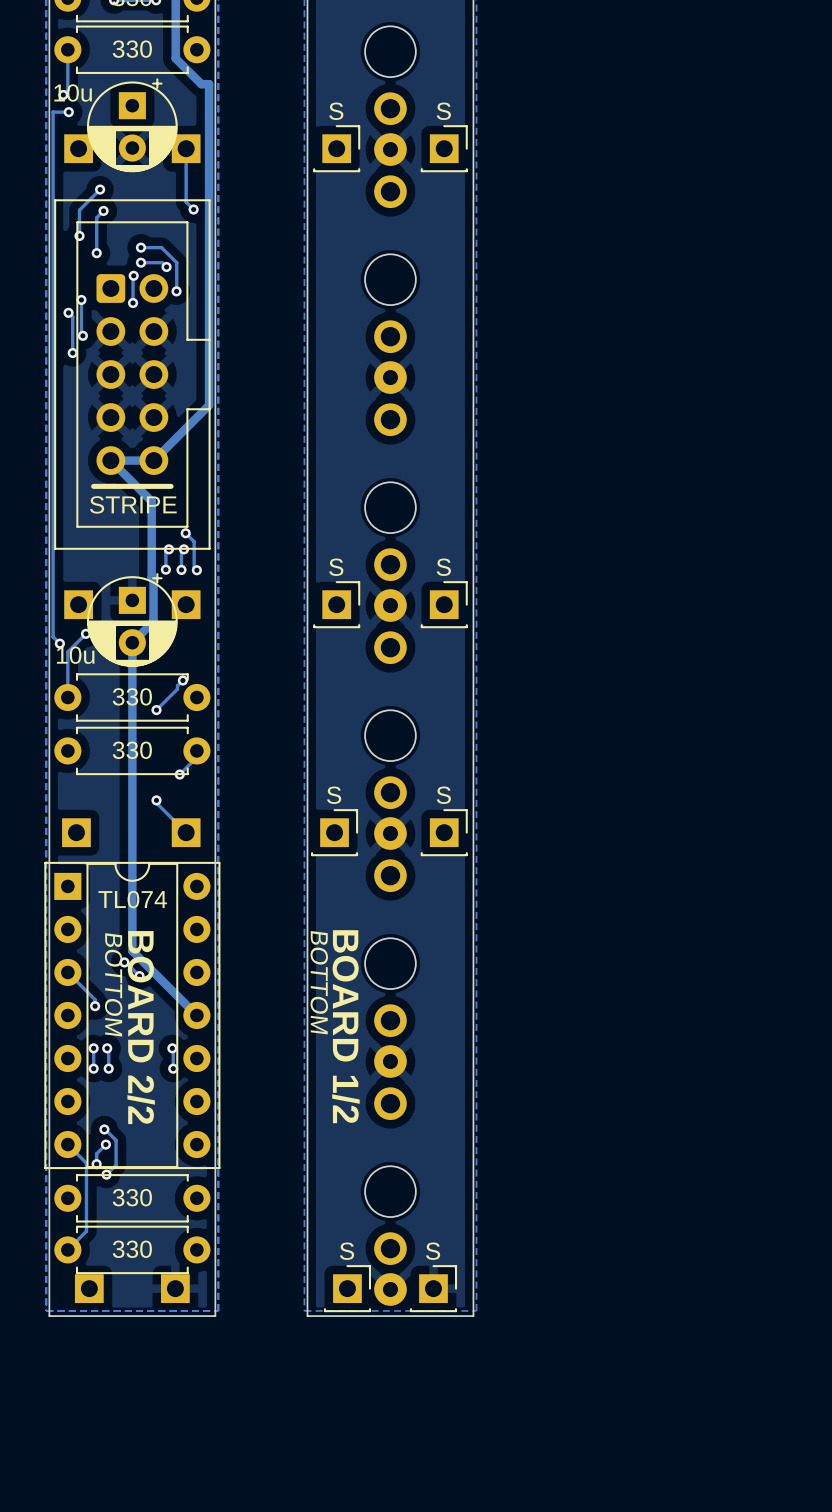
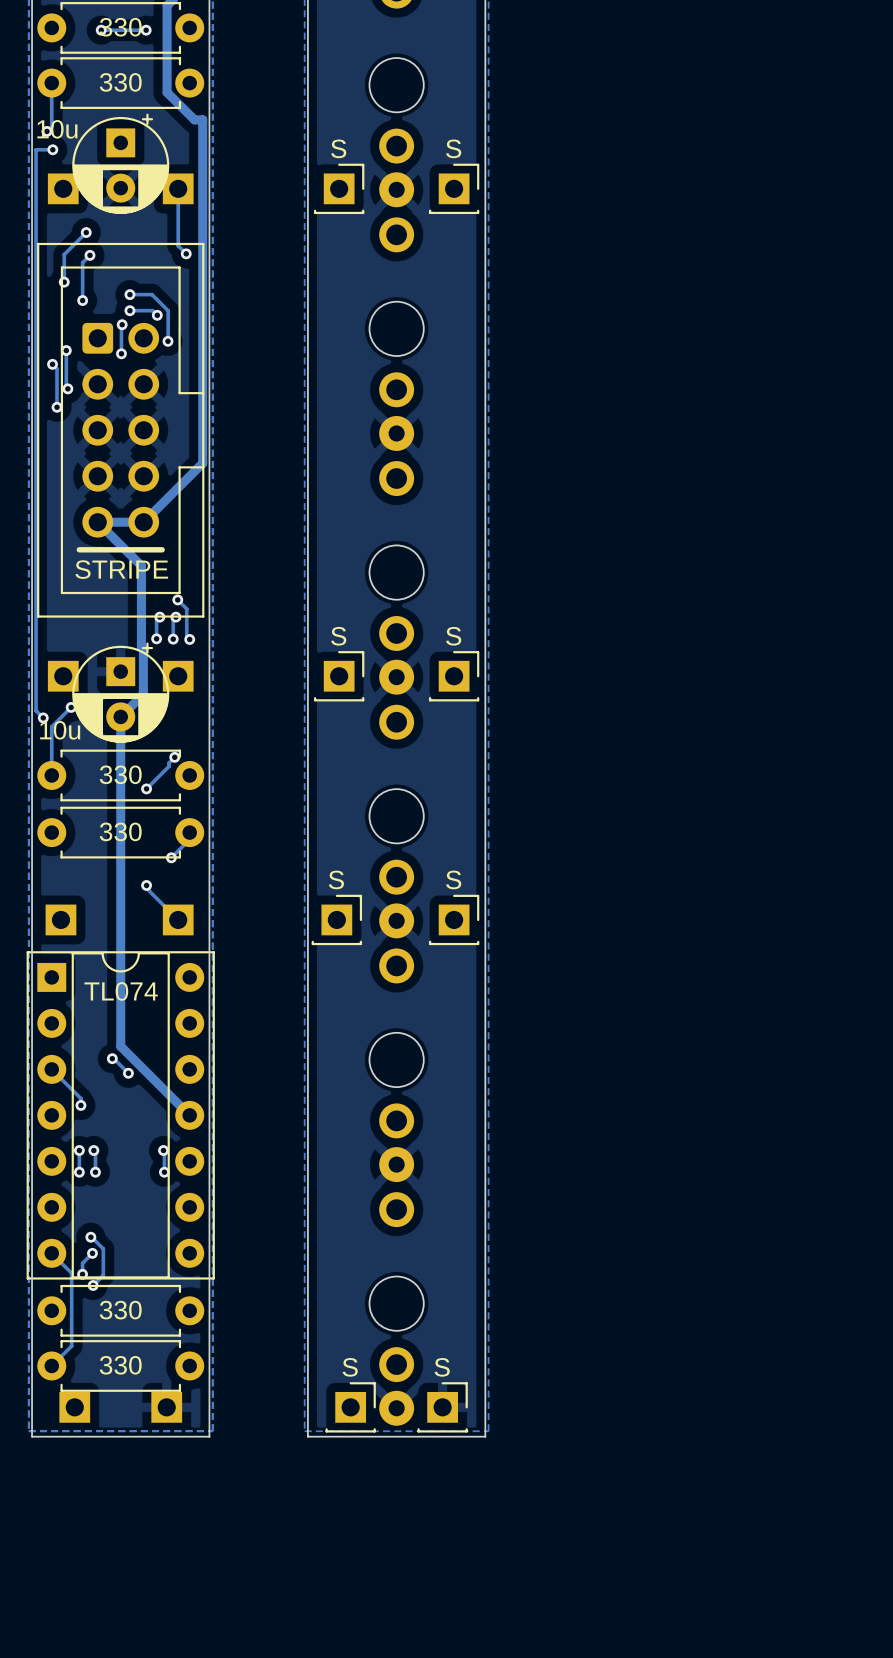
text: BOTTOM (319, 982) -> none
text: BOTTOM (113, 984) -> none
text: BOARD 1/2 (345, 1026) -> none
text: BOARD 2/2 (141, 1027) -> none

